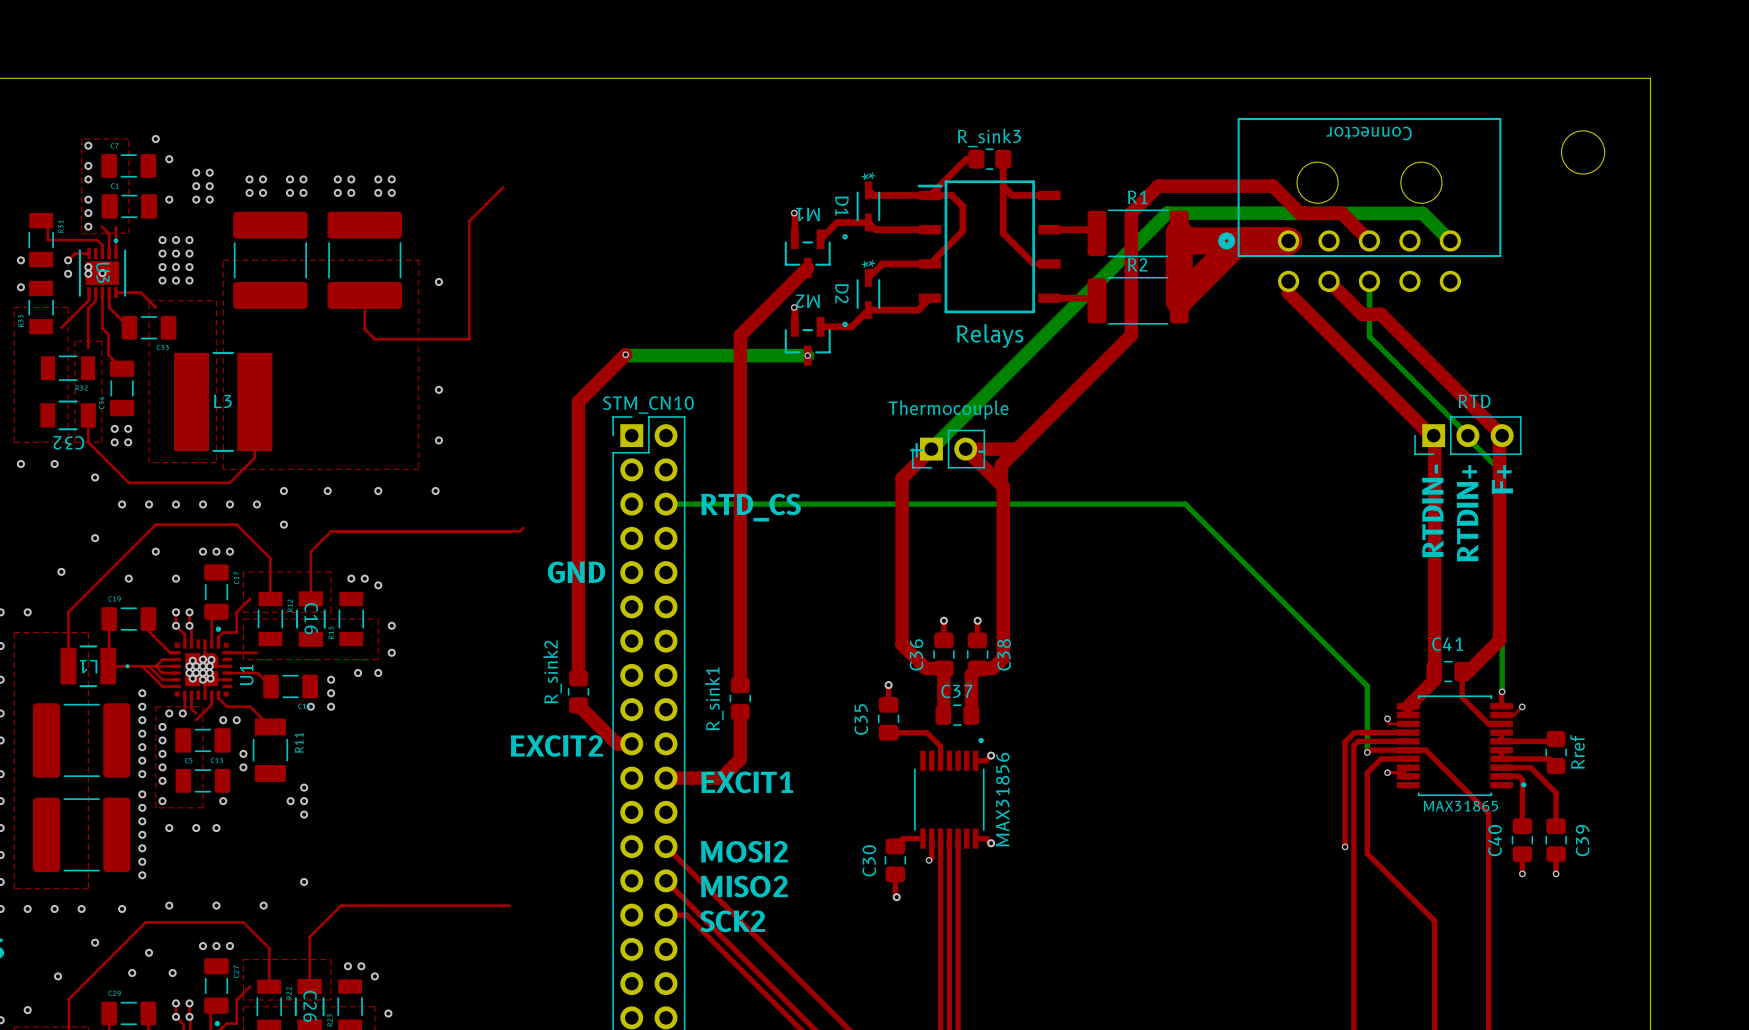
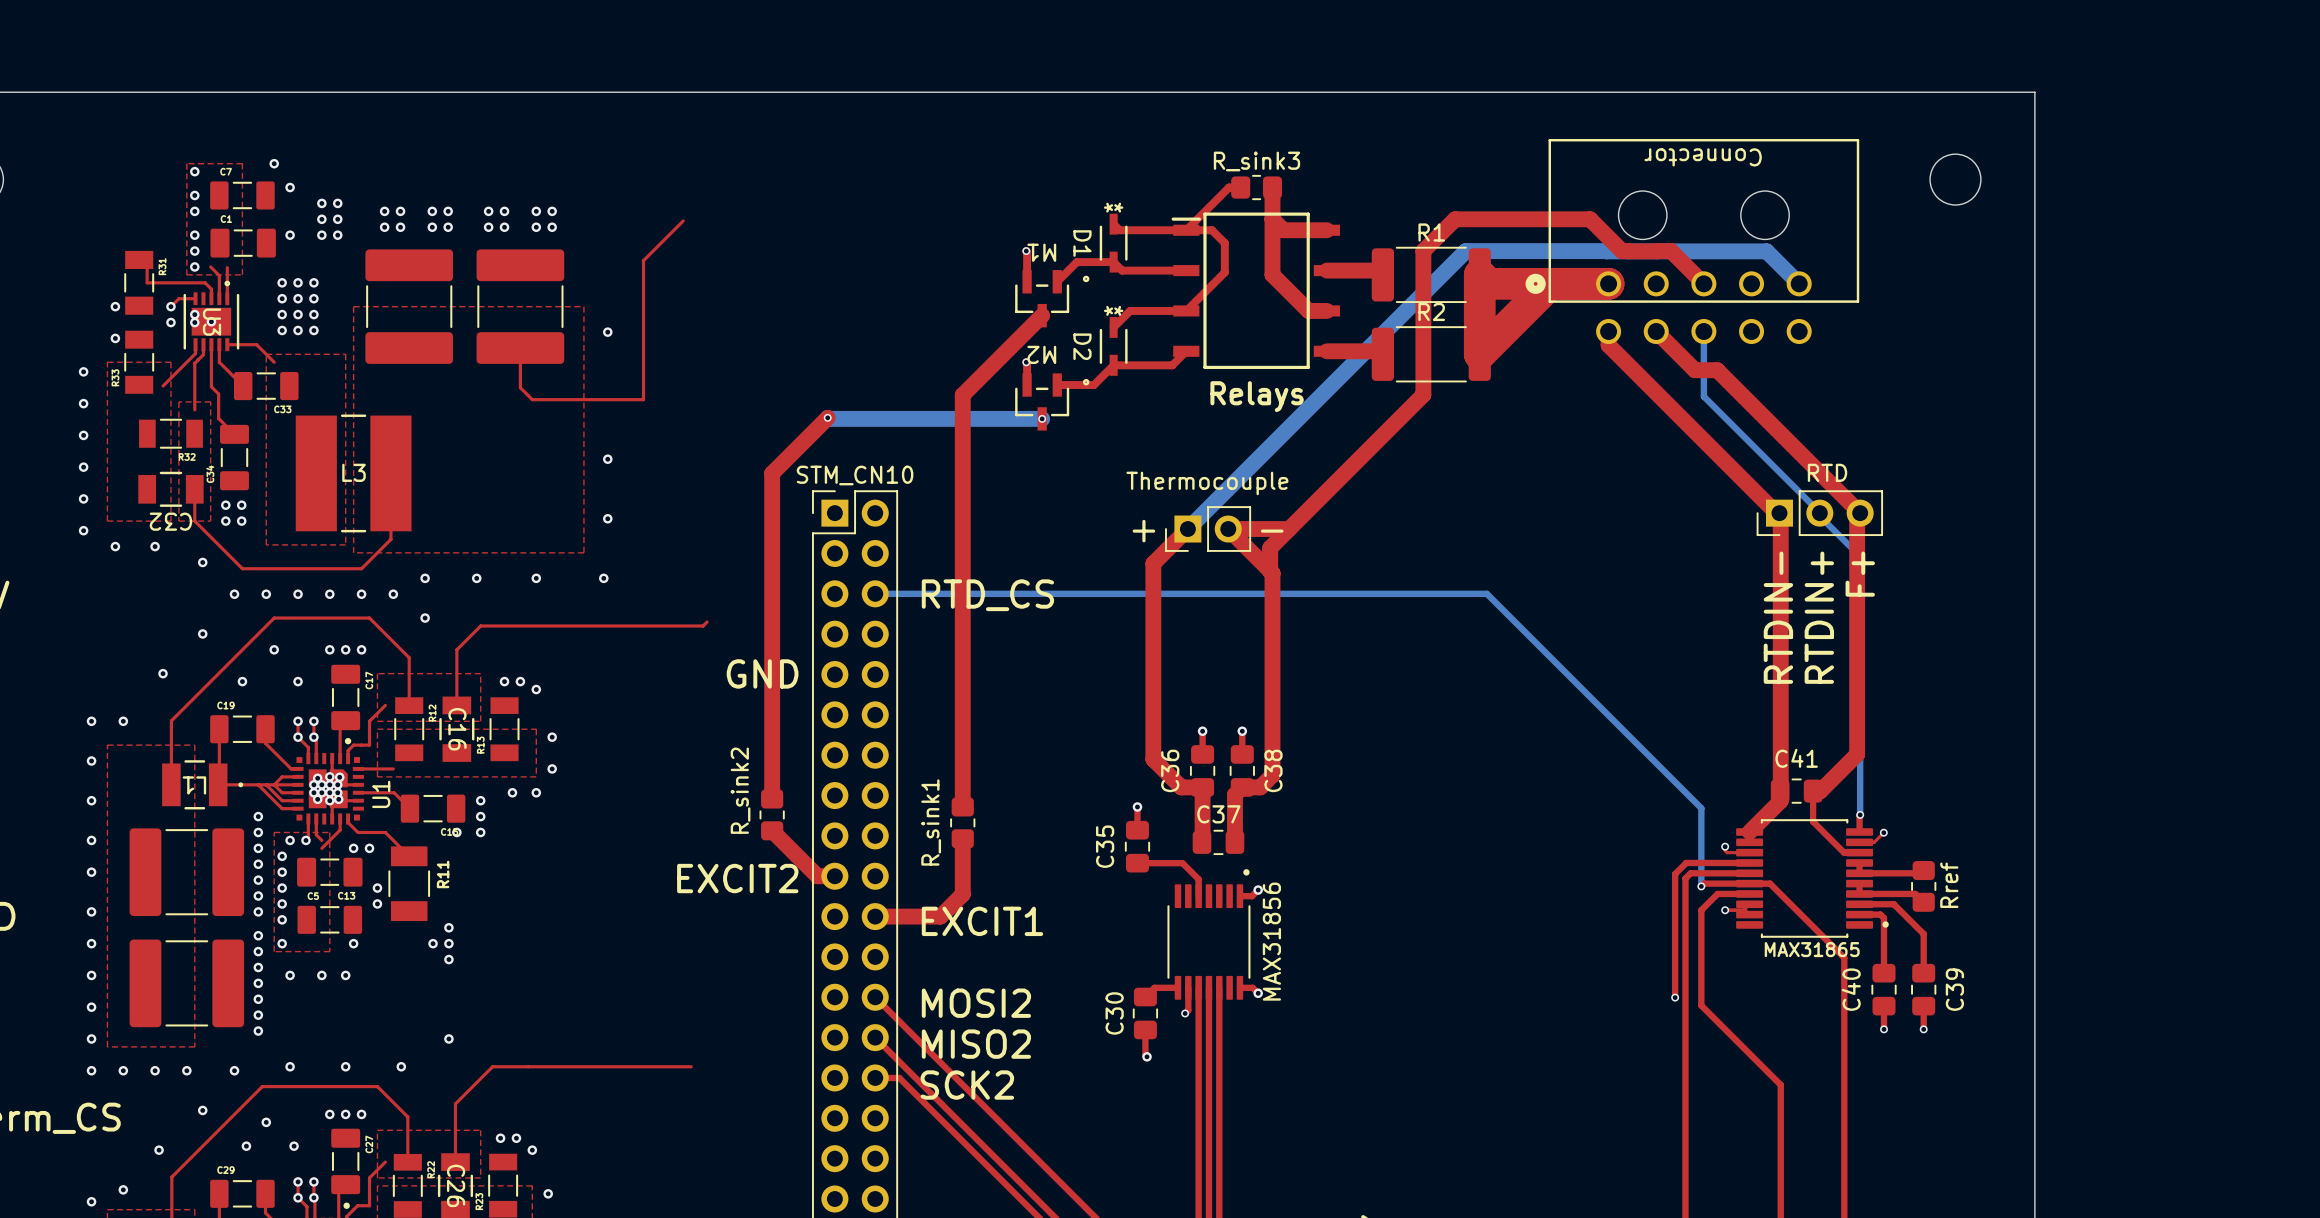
top track width: thin (1003, 159) (1003, 233) (1033, 263) (1049, 263) -> thick (1272, 187) (1272, 274) (1308, 310) (1326, 310)
top track width: thin (1003, 186) (1012, 195) (1049, 195) -> thick (1272, 219) (1283, 230) (1326, 230)
top track width: thin (1049, 229) (1093, 229) -> thick (1326, 270) (1378, 270)
top track width: thin (1049, 298) (1094, 298) -> thick (1326, 351) (1379, 351)

